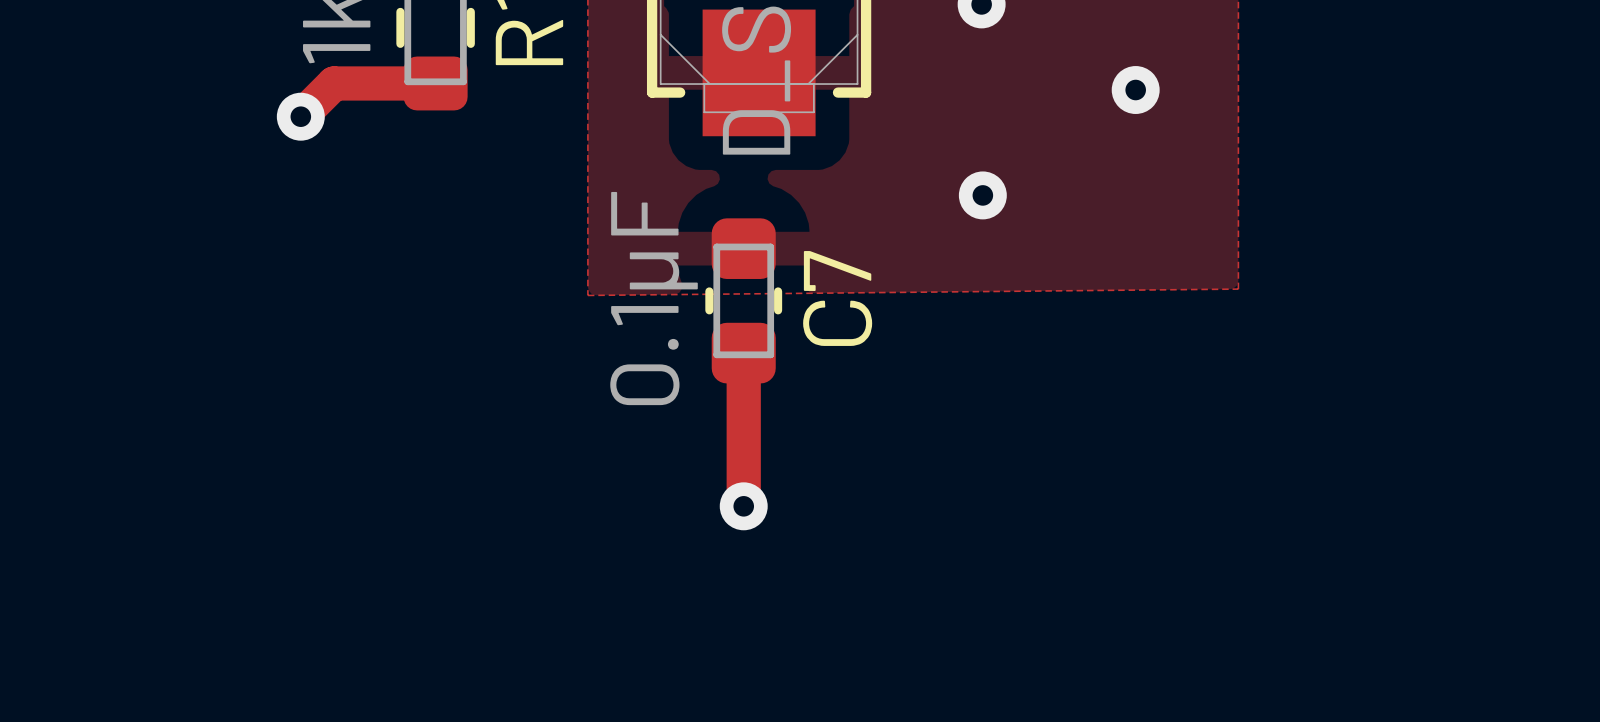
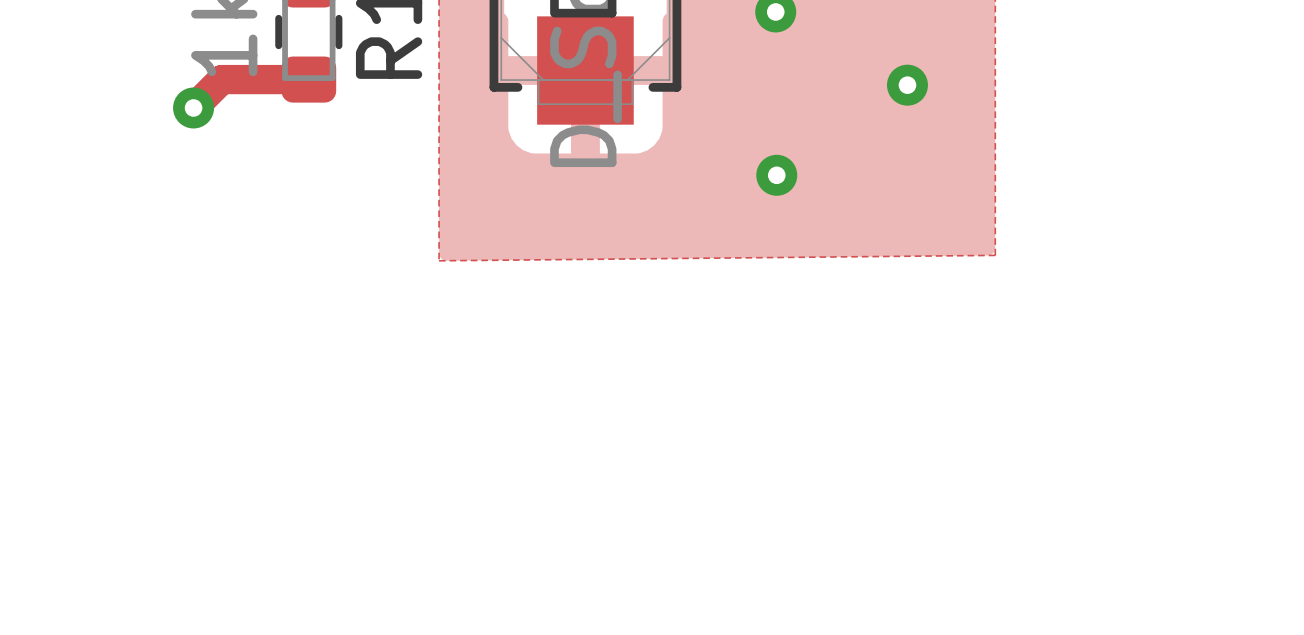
C7: 0.1µF (743, 300) -> none
track: (743, 353) (743, 506) -> none
via: (743, 506) -> none

